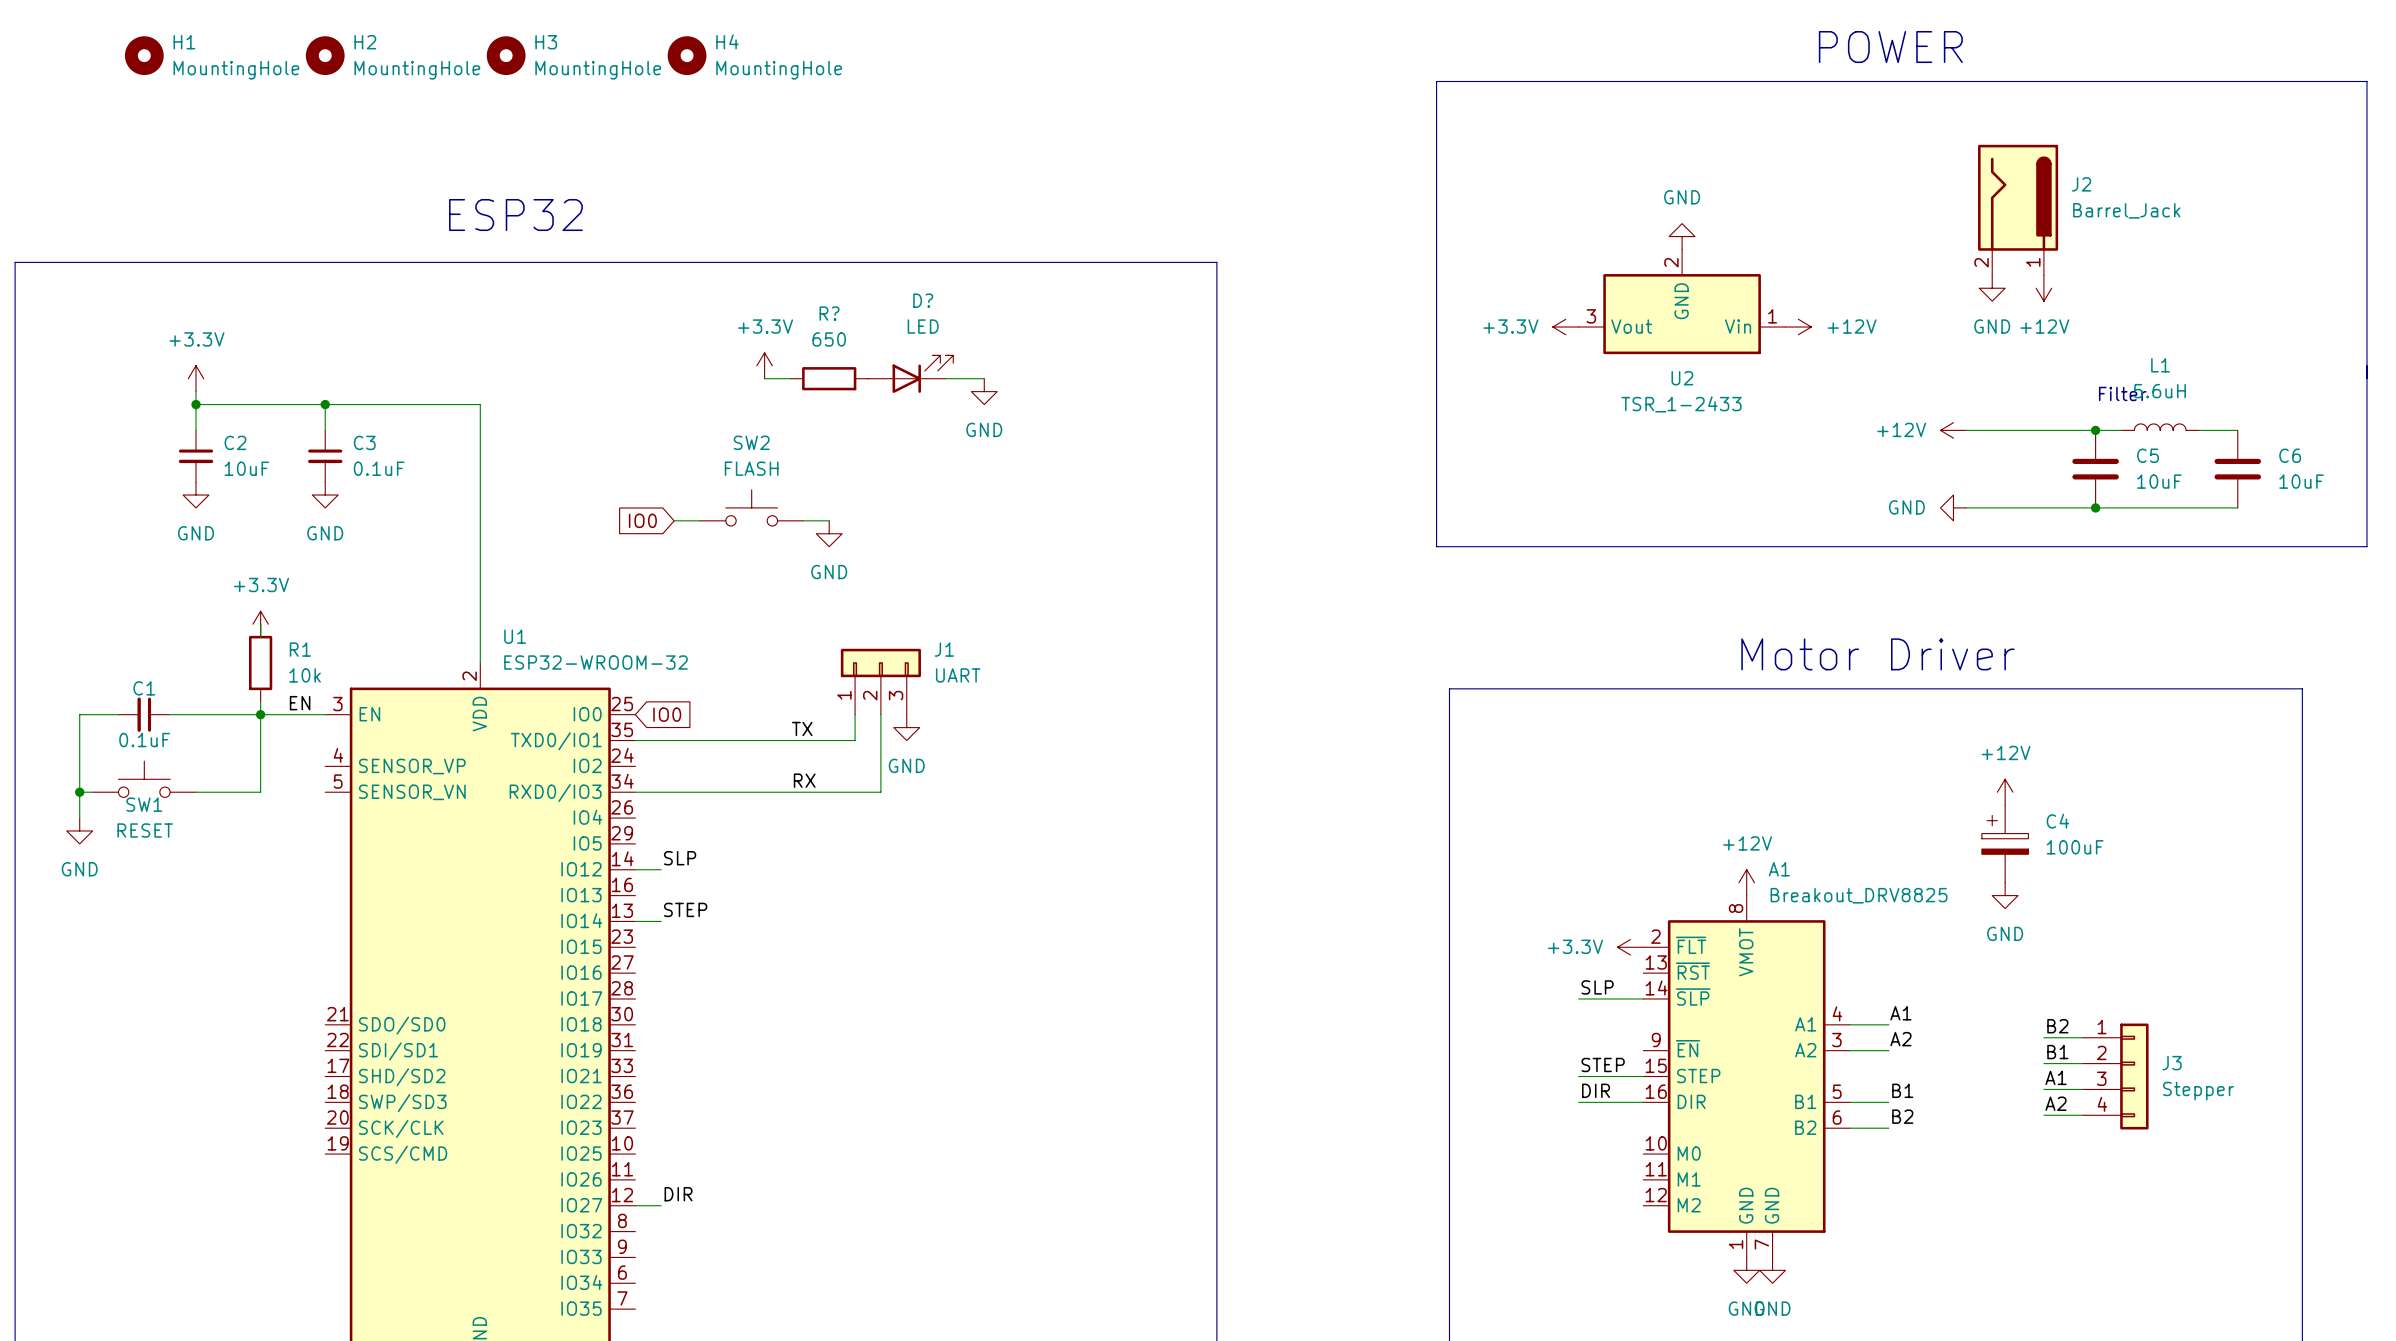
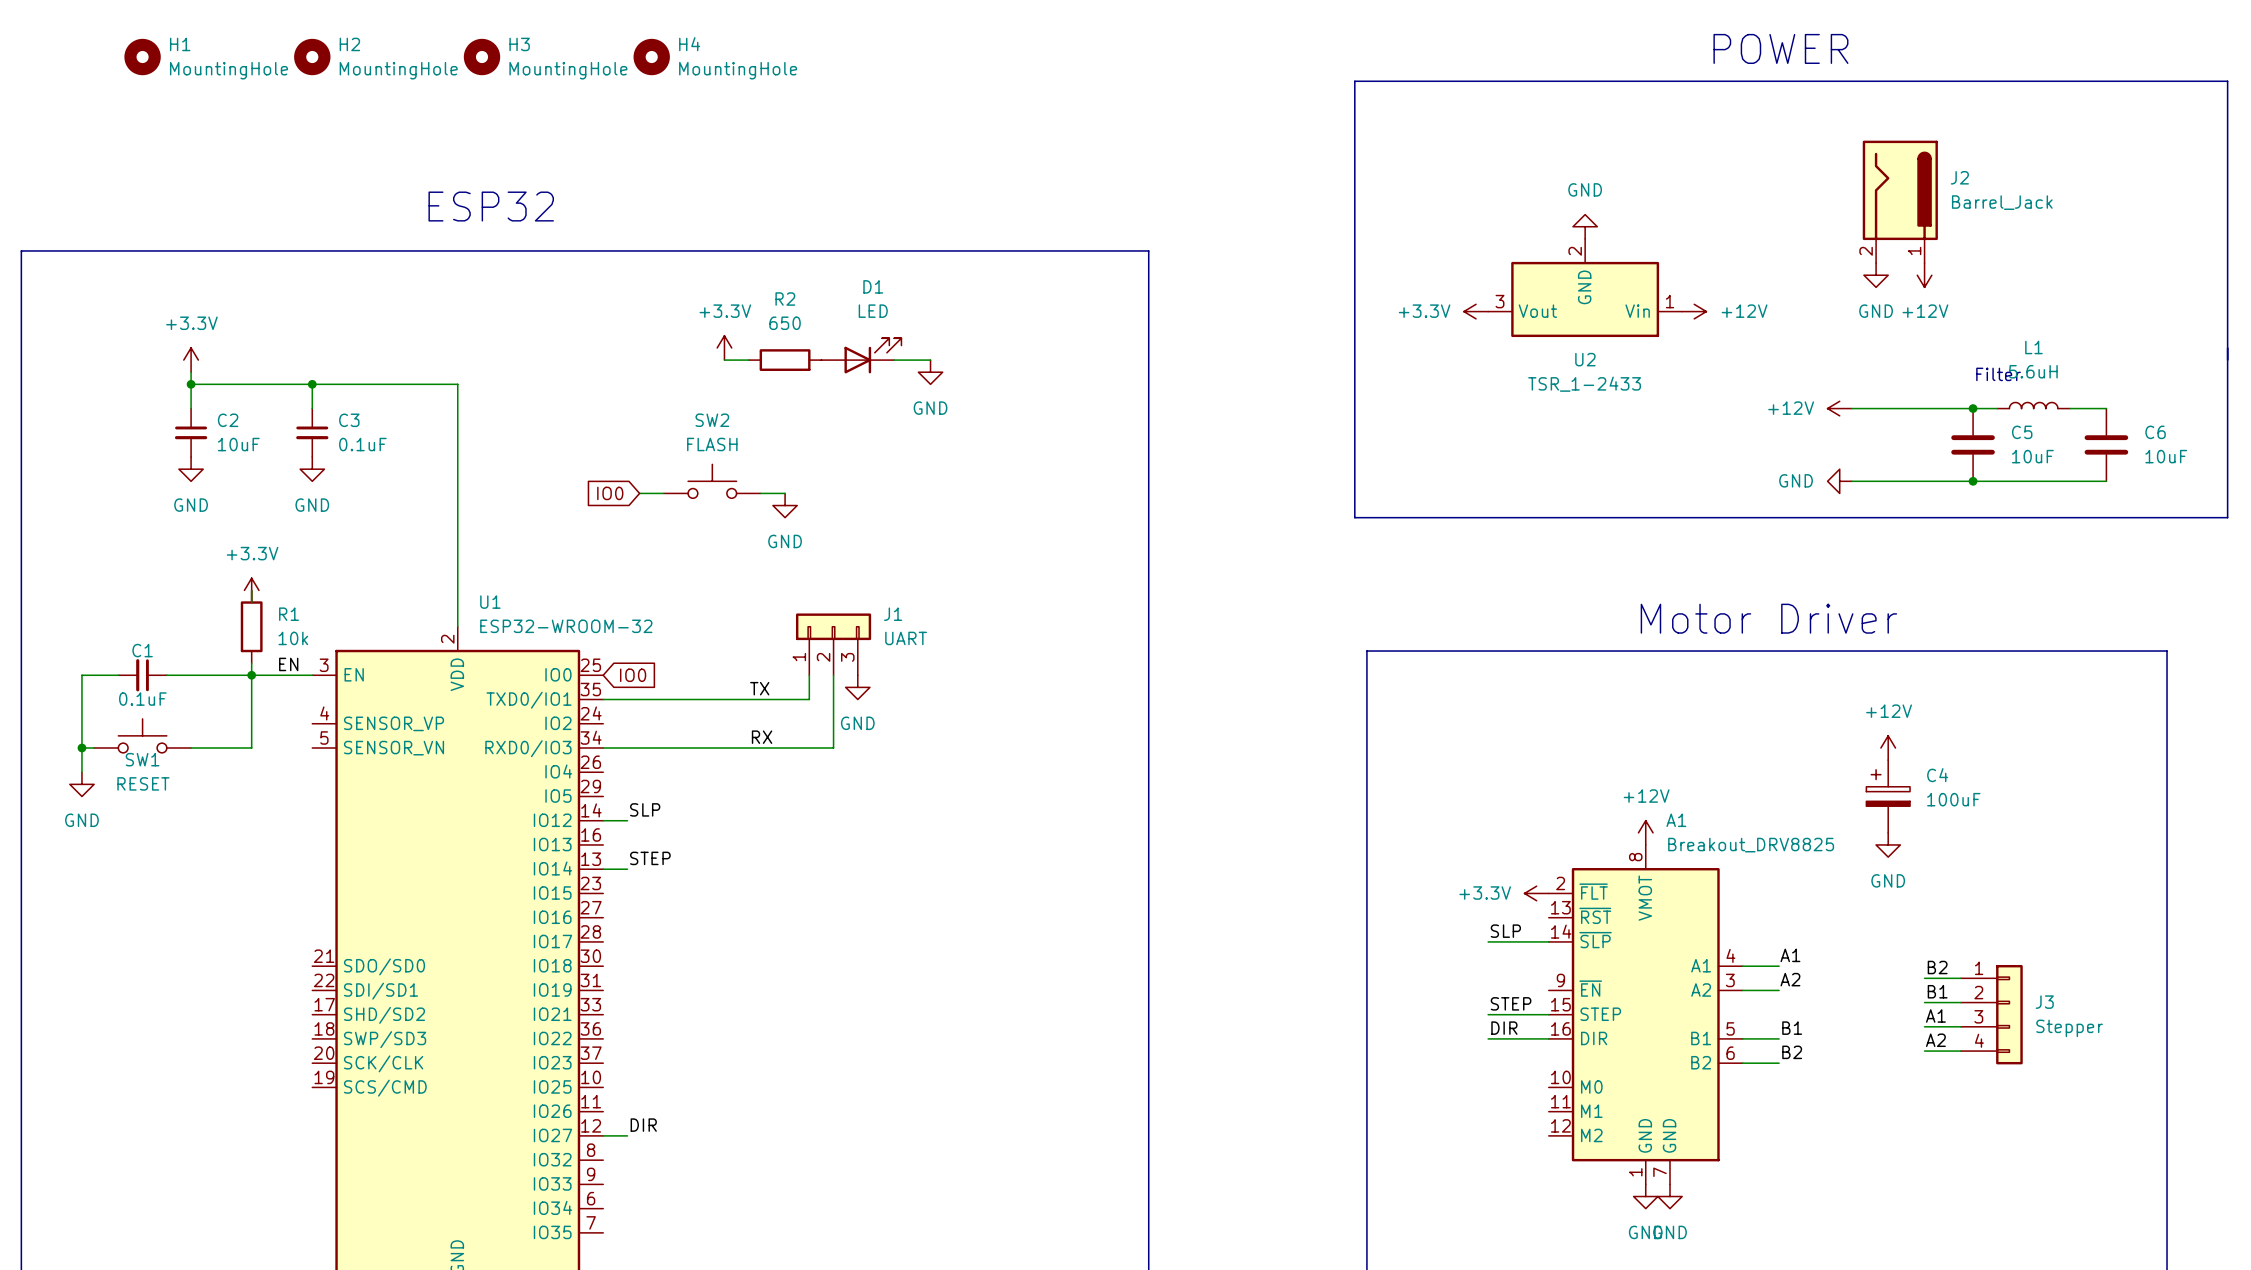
D? name: D? (923, 300) -> D1 (873, 286)
R? name: R? (829, 313) -> R2 (785, 299)

